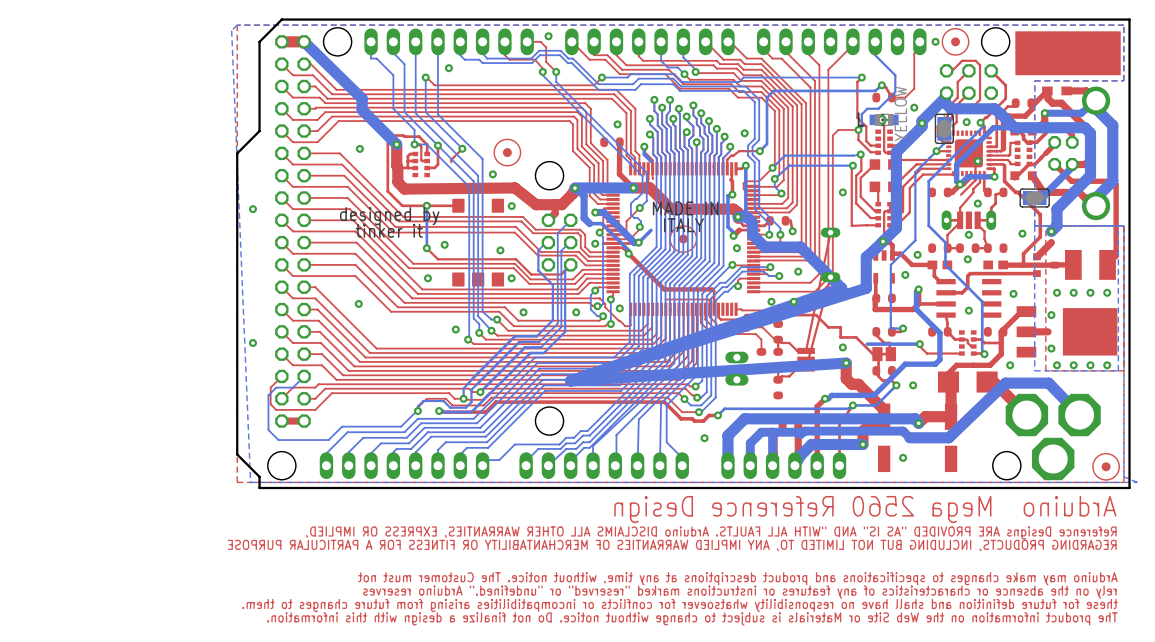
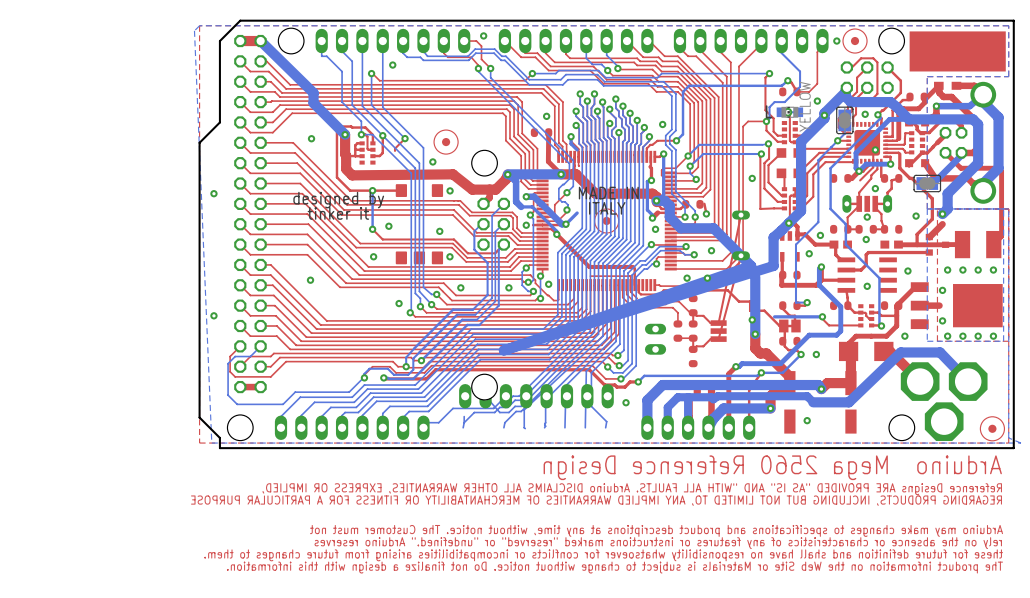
bottom track: (846, 363) (570, 380) -> (755, 334) (755, 277)
bottom track: (566, 448) (548, 465) -> (499, 412) (485, 396)
part position: (604, 465) -> (536, 396)

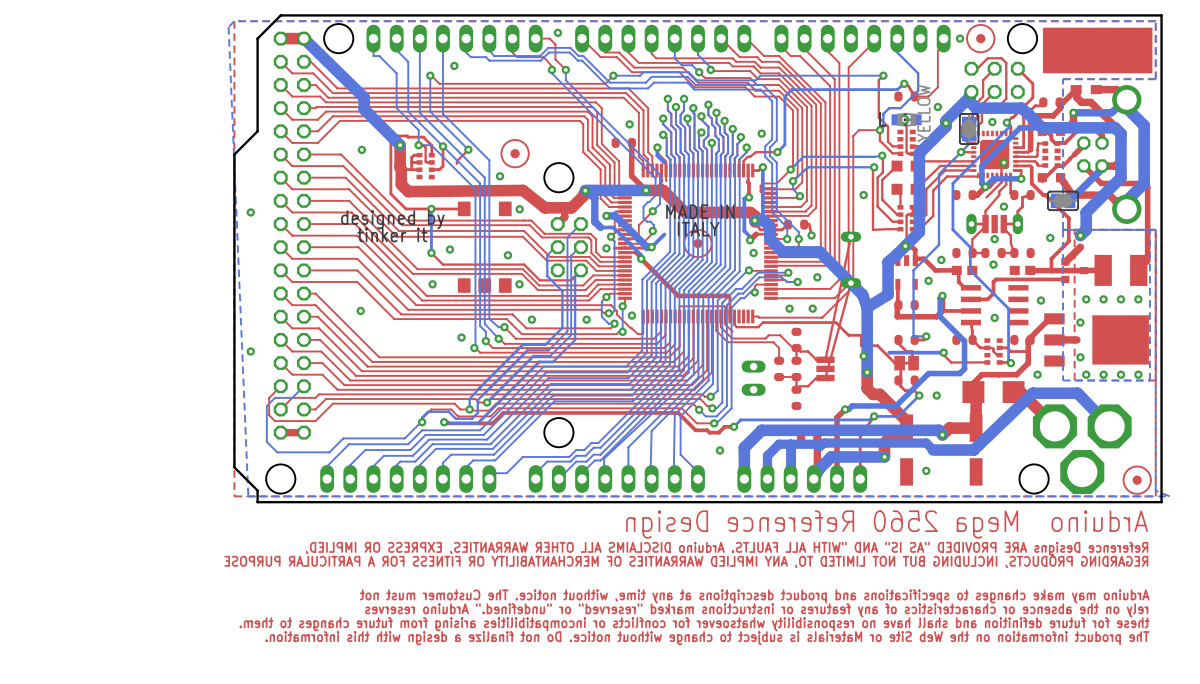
bottom track: (773, 265) (503, 350) (751, 265) -> (888, 294) (867, 307) (862, 294)
bottom track: (485, 396) (499, 412) -> (558, 479) (576, 461)
part position: (536, 396) -> (616, 479)

